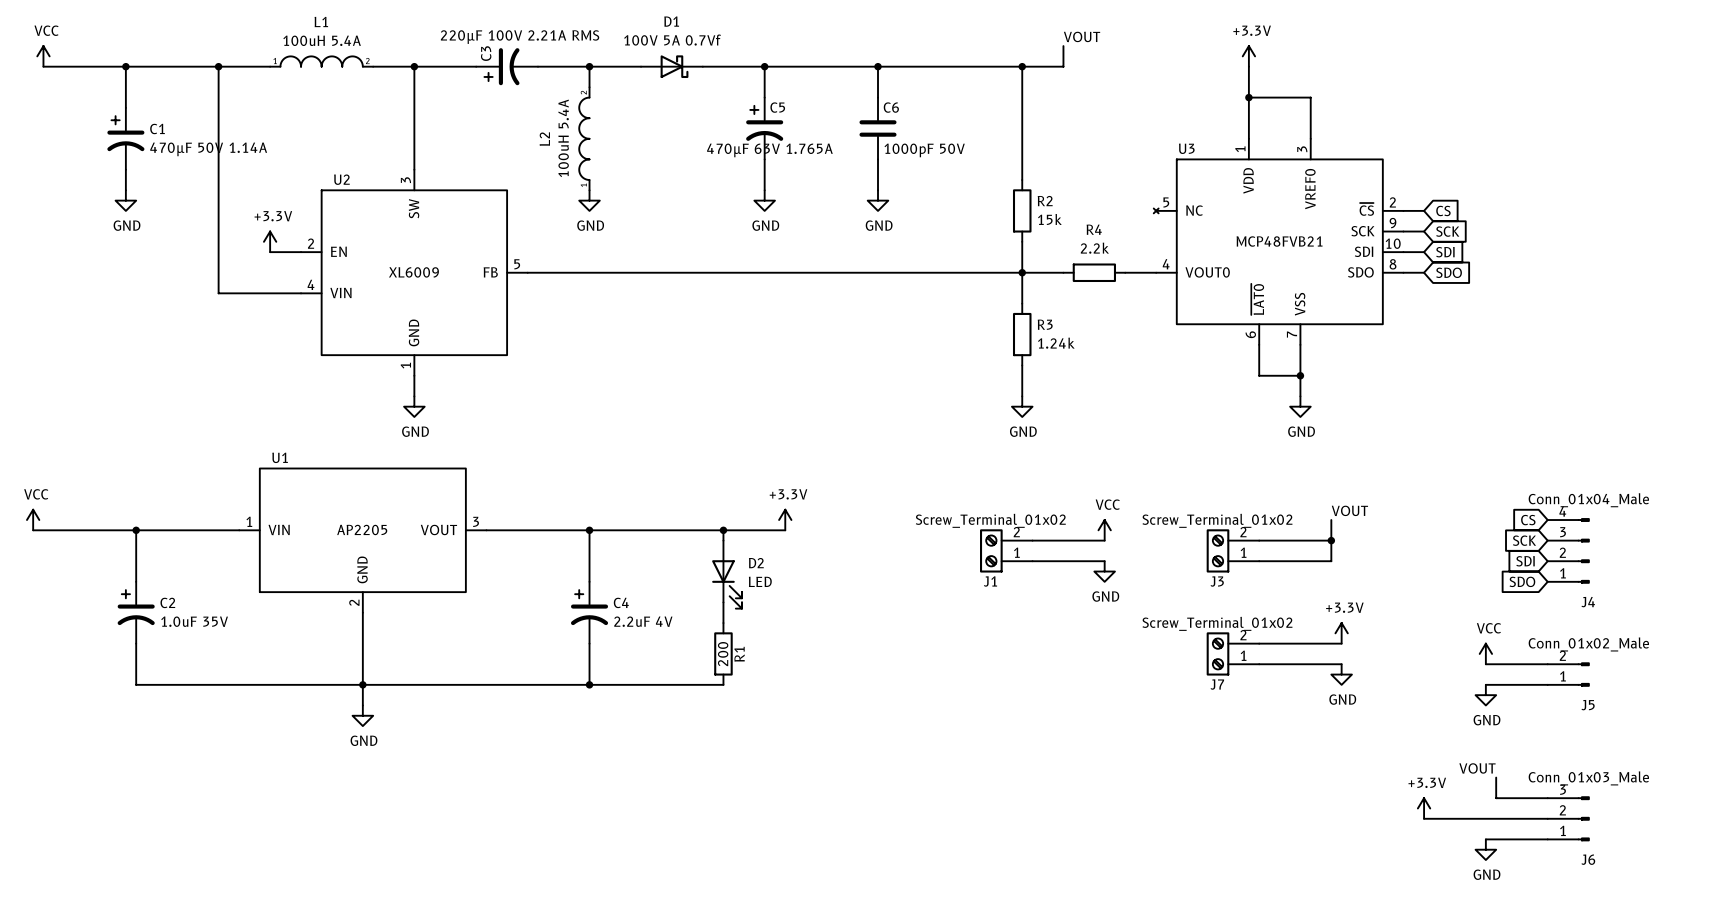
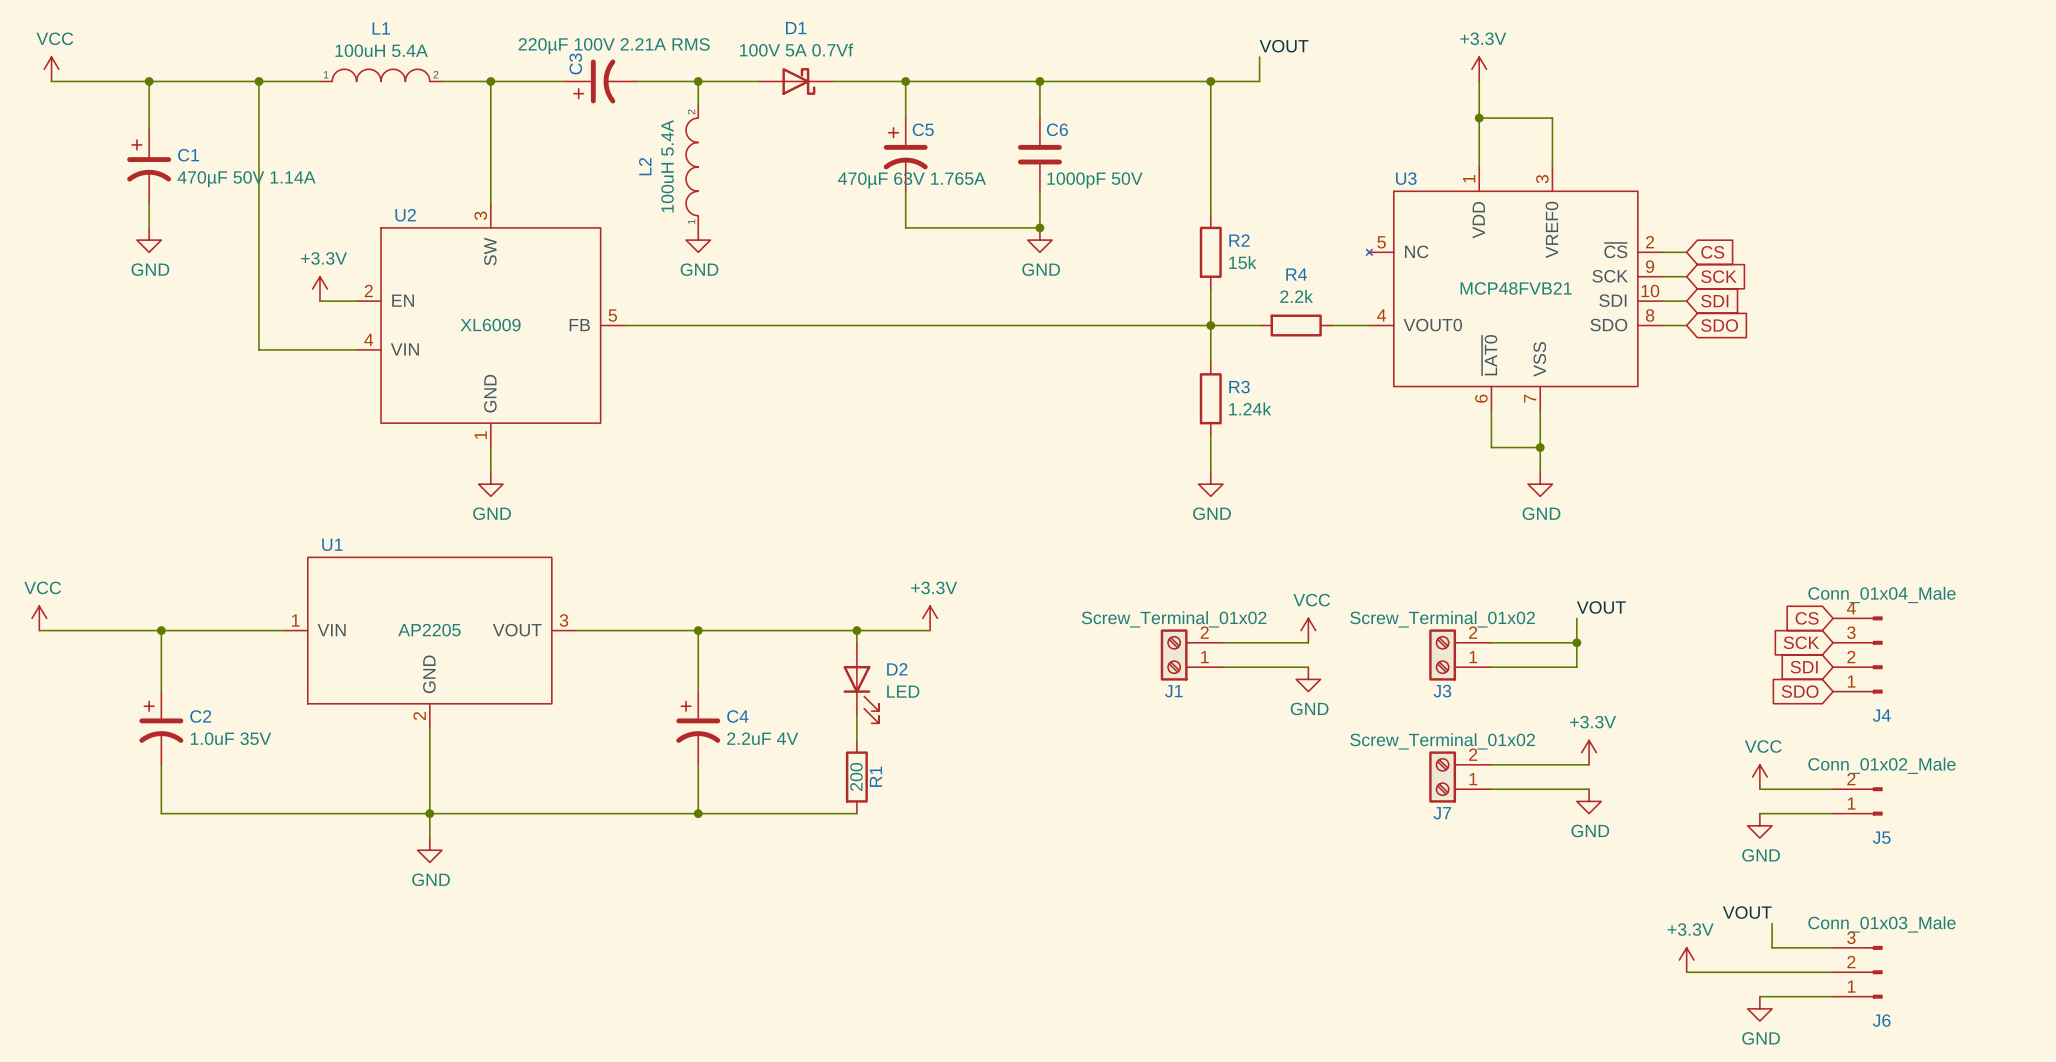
wire: none -> (905, 227) (1039, 227)
junction: none -> (1039, 227)
power symbol: GND (764, 200) -> none

